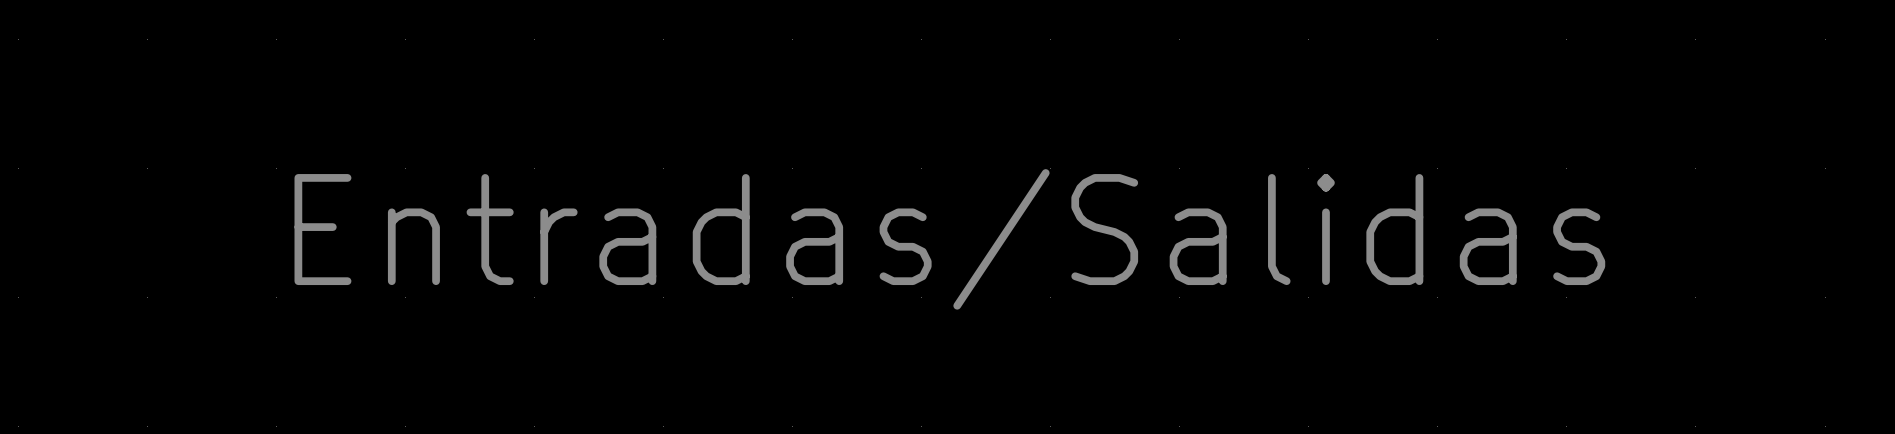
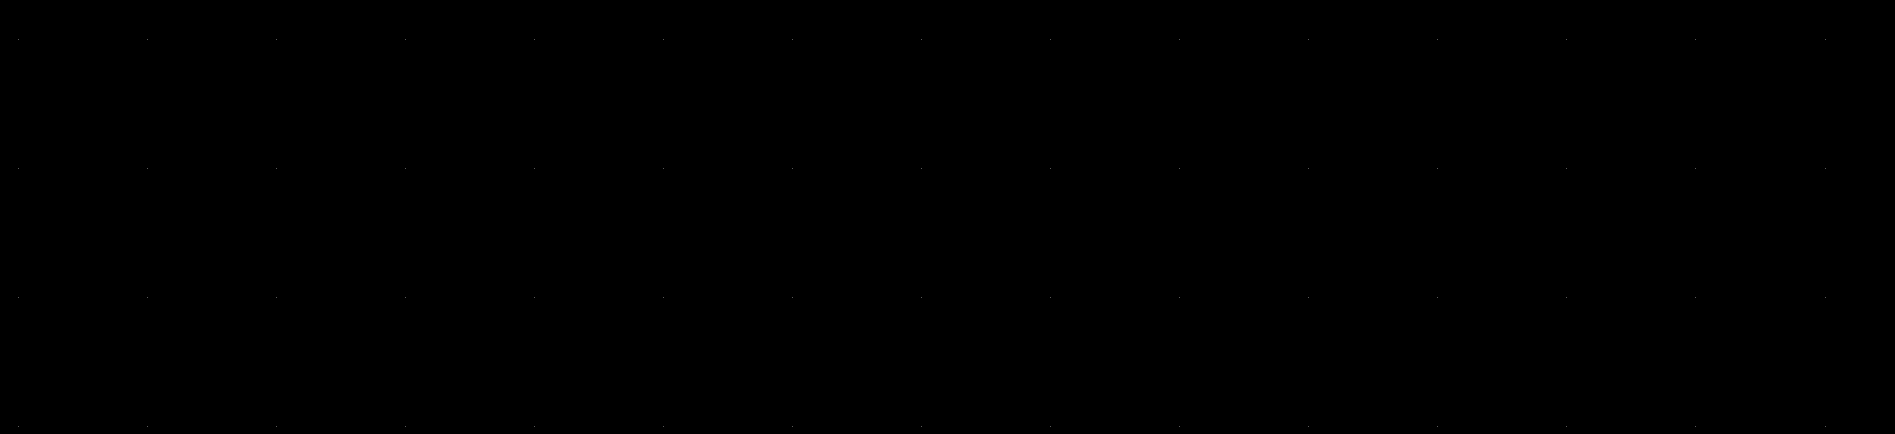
text: Entradas/Salidas (949, 239) -> none

